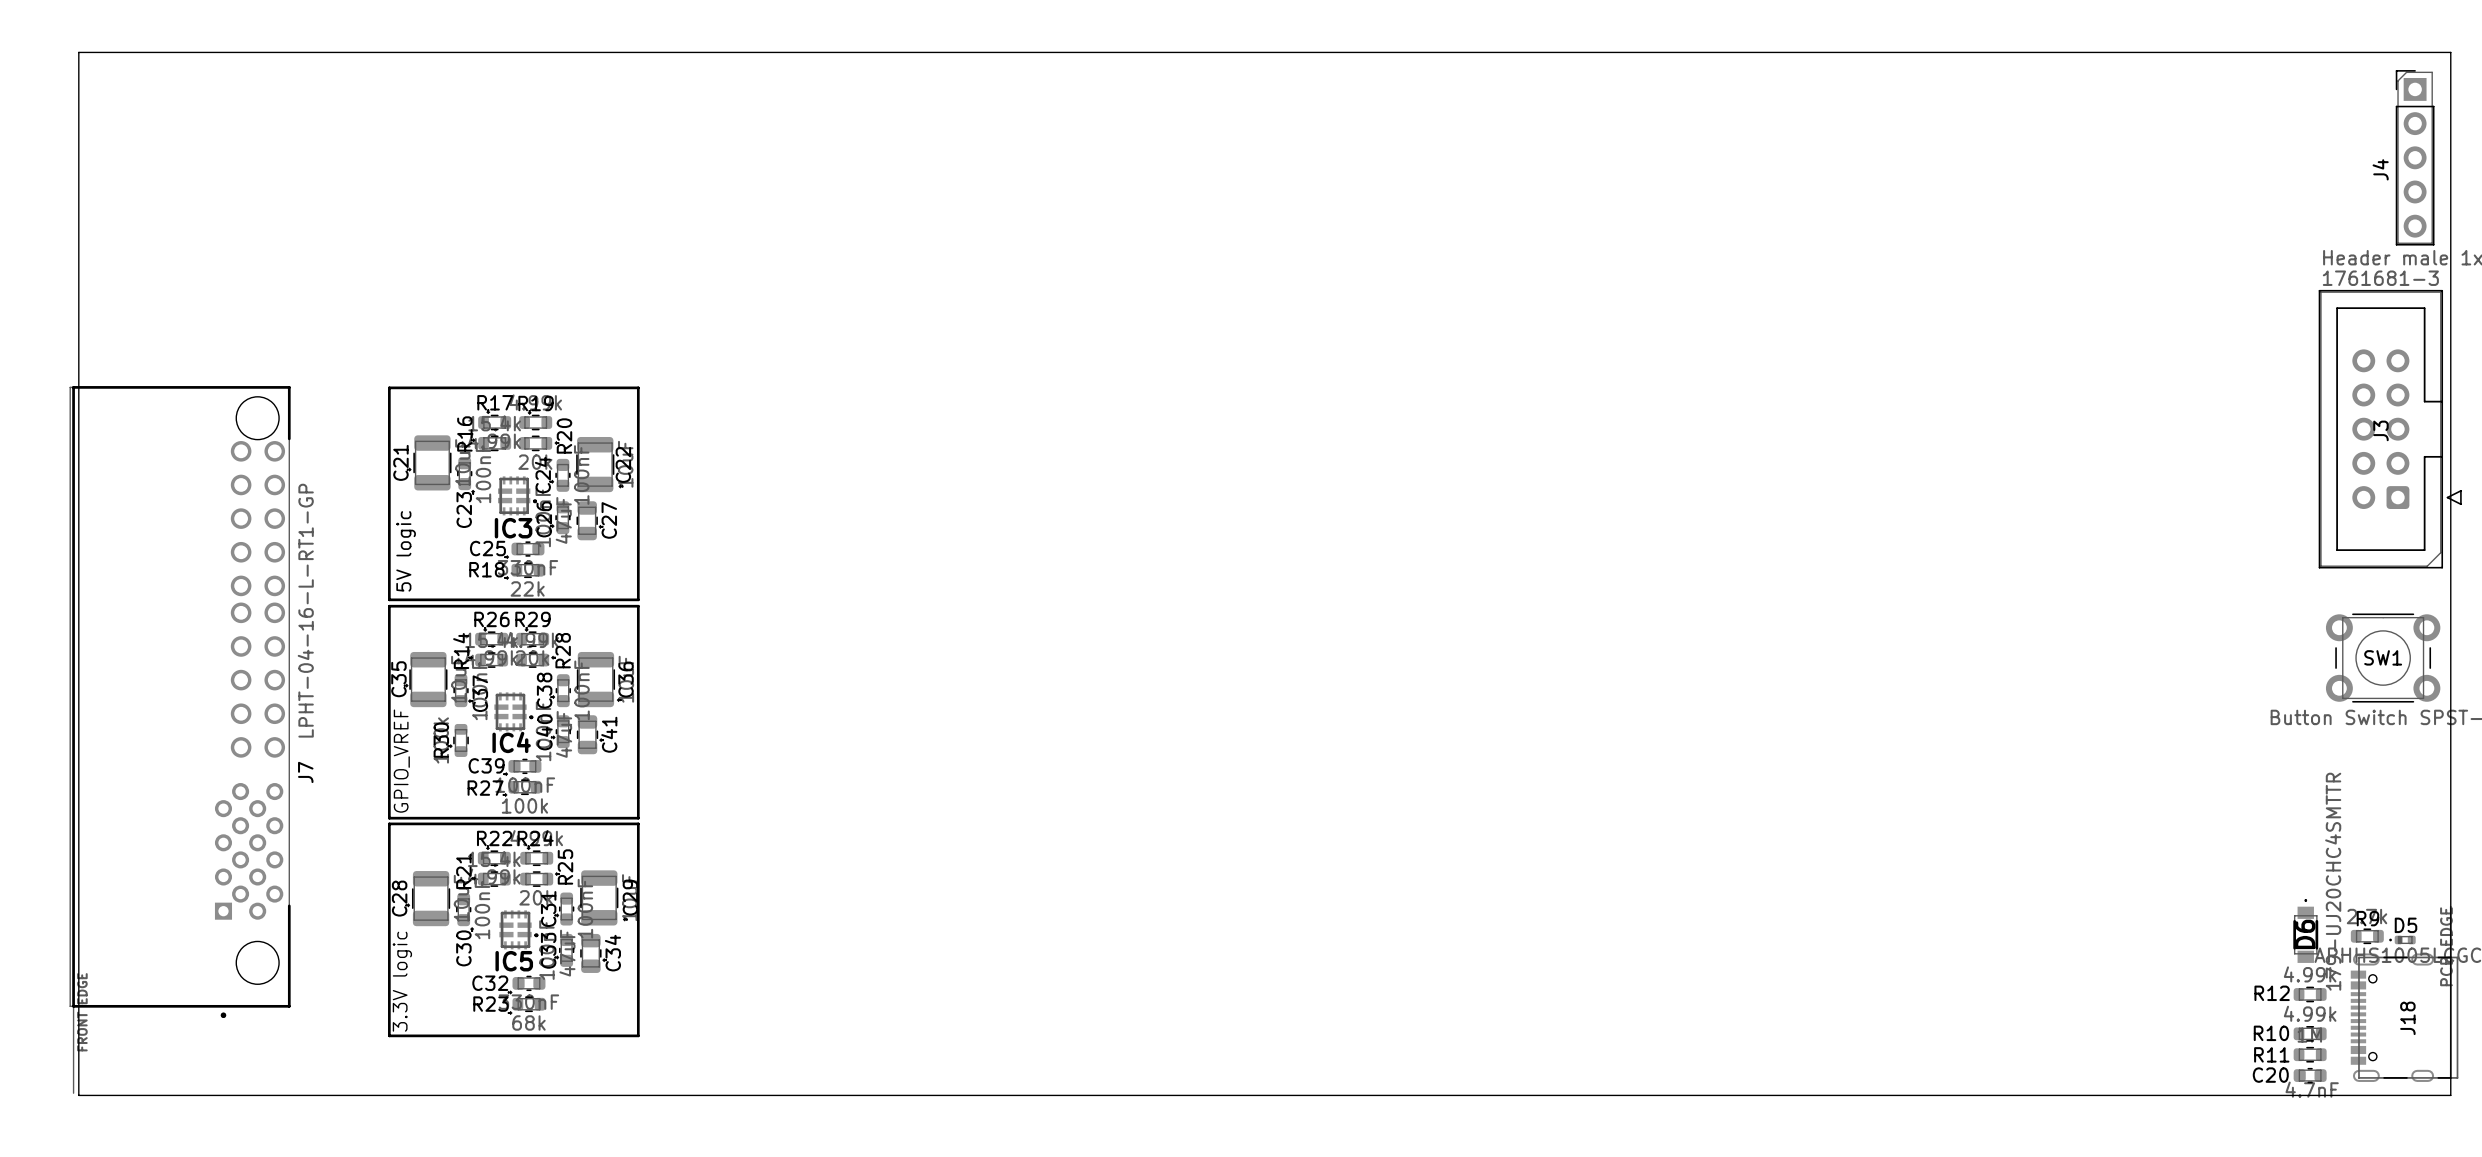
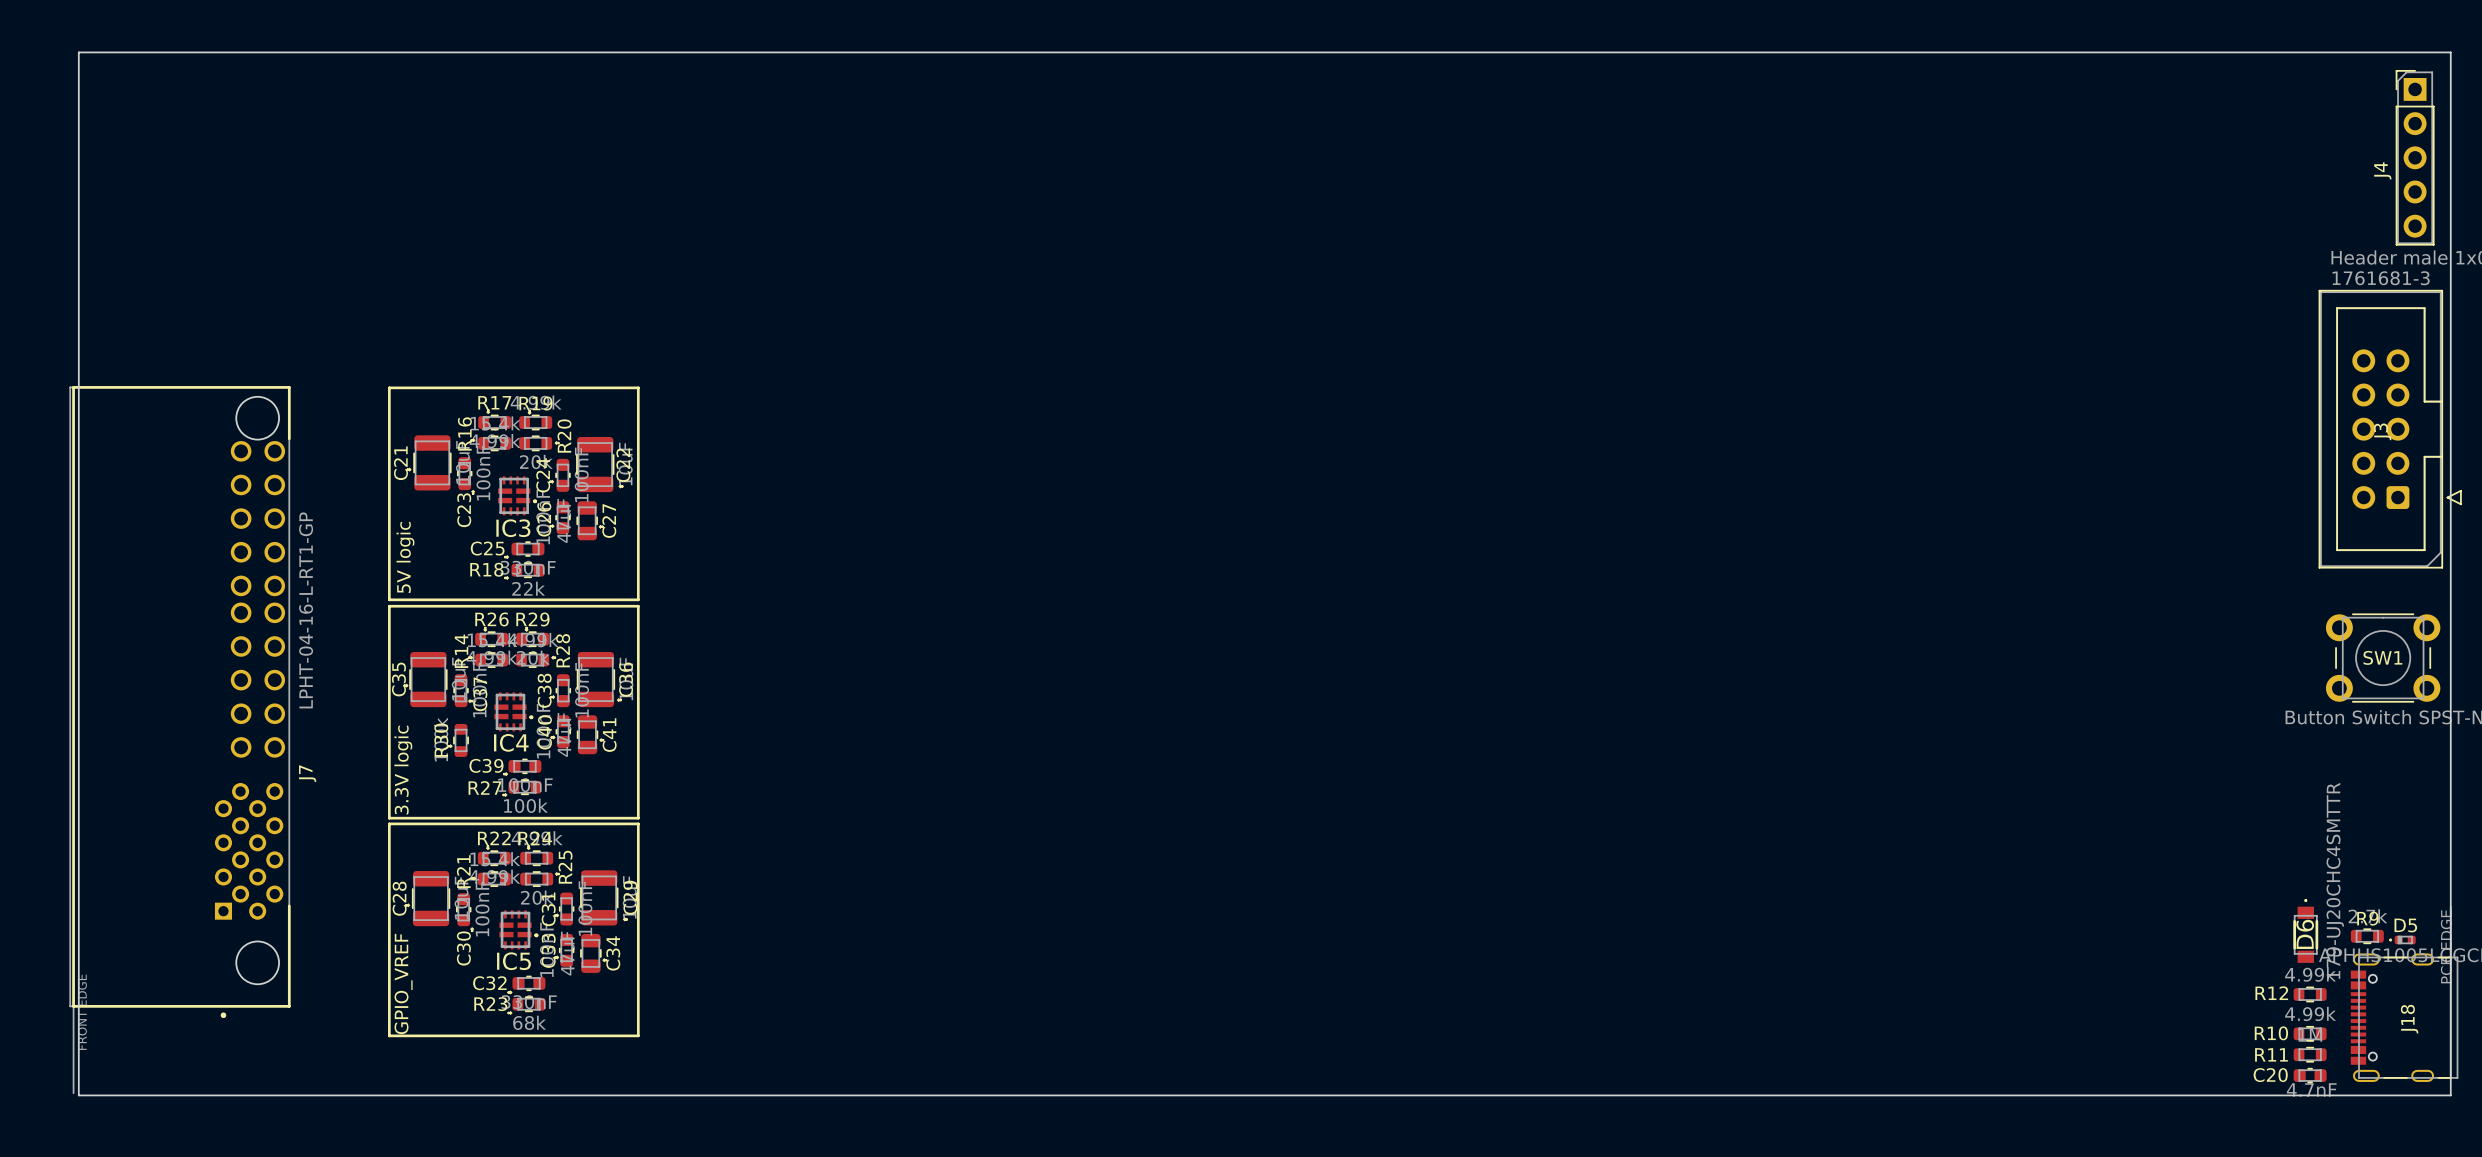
text: GPIO_VREF (401, 761) -> 3.3V logic (403, 770)
text: 3.3V logic (402, 981) -> GPIO_VREF (403, 984)

